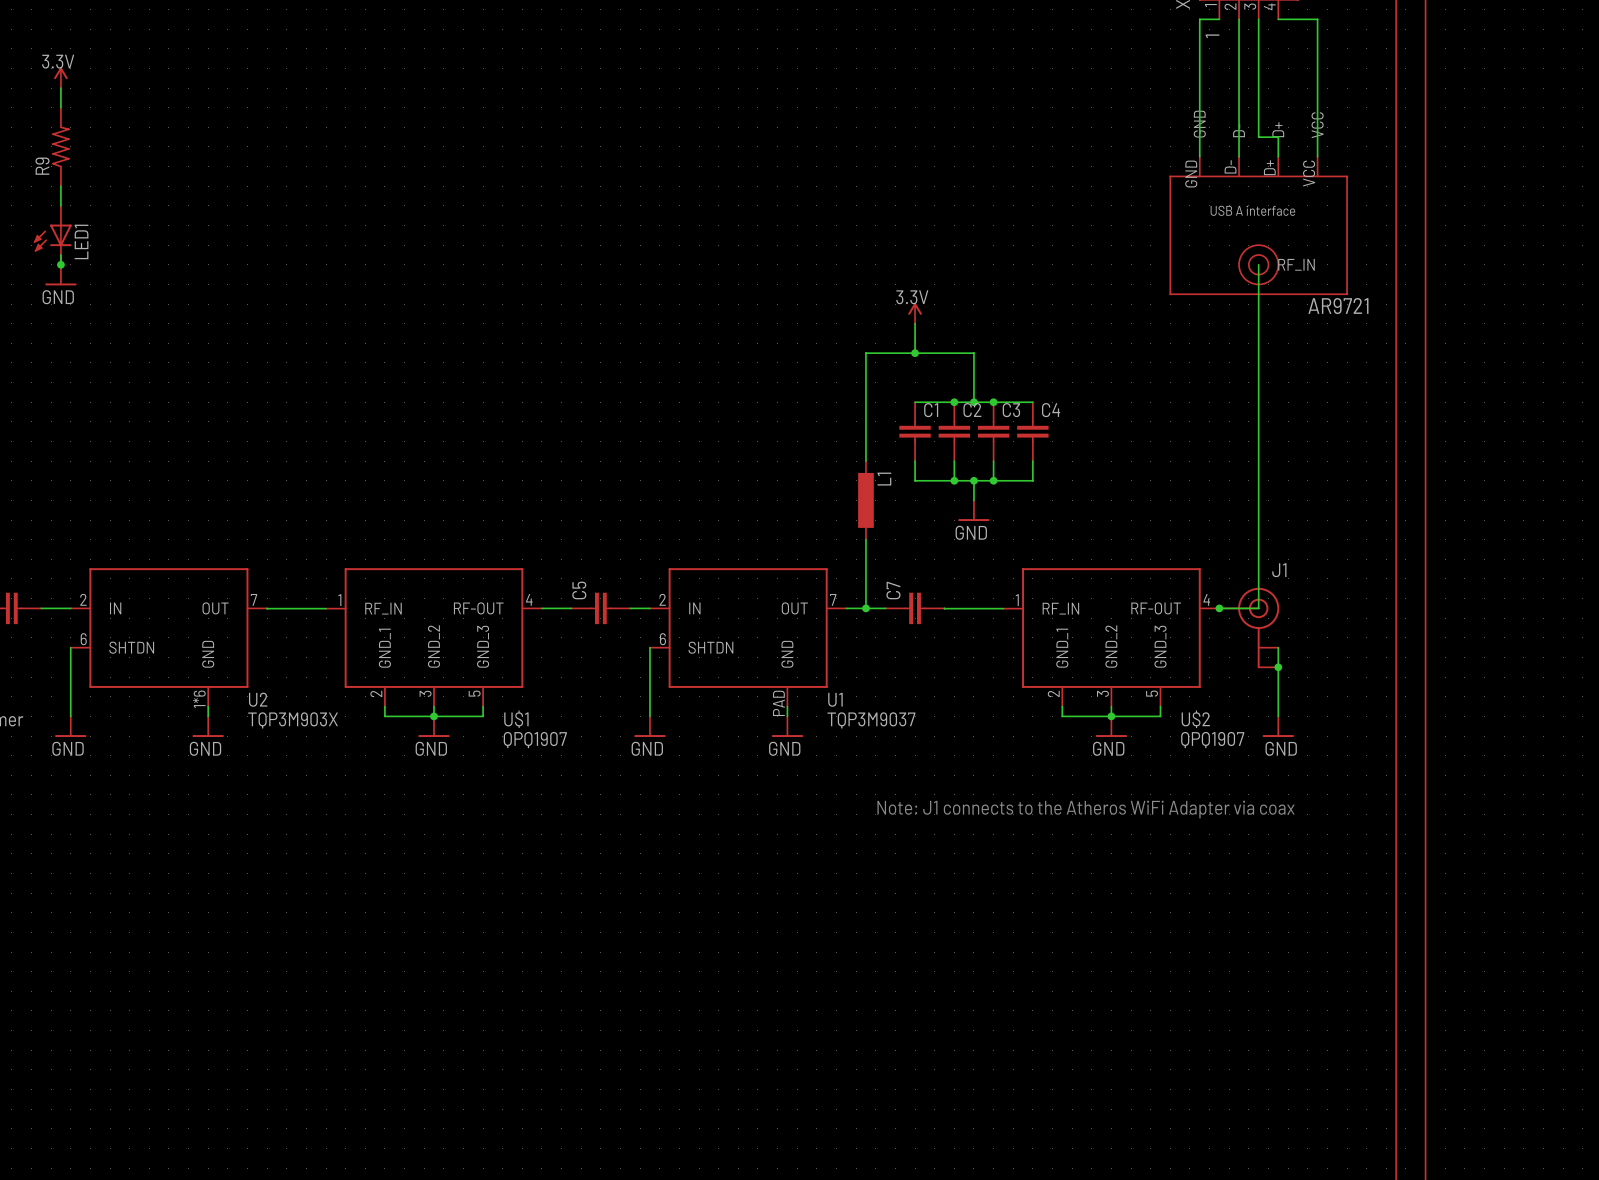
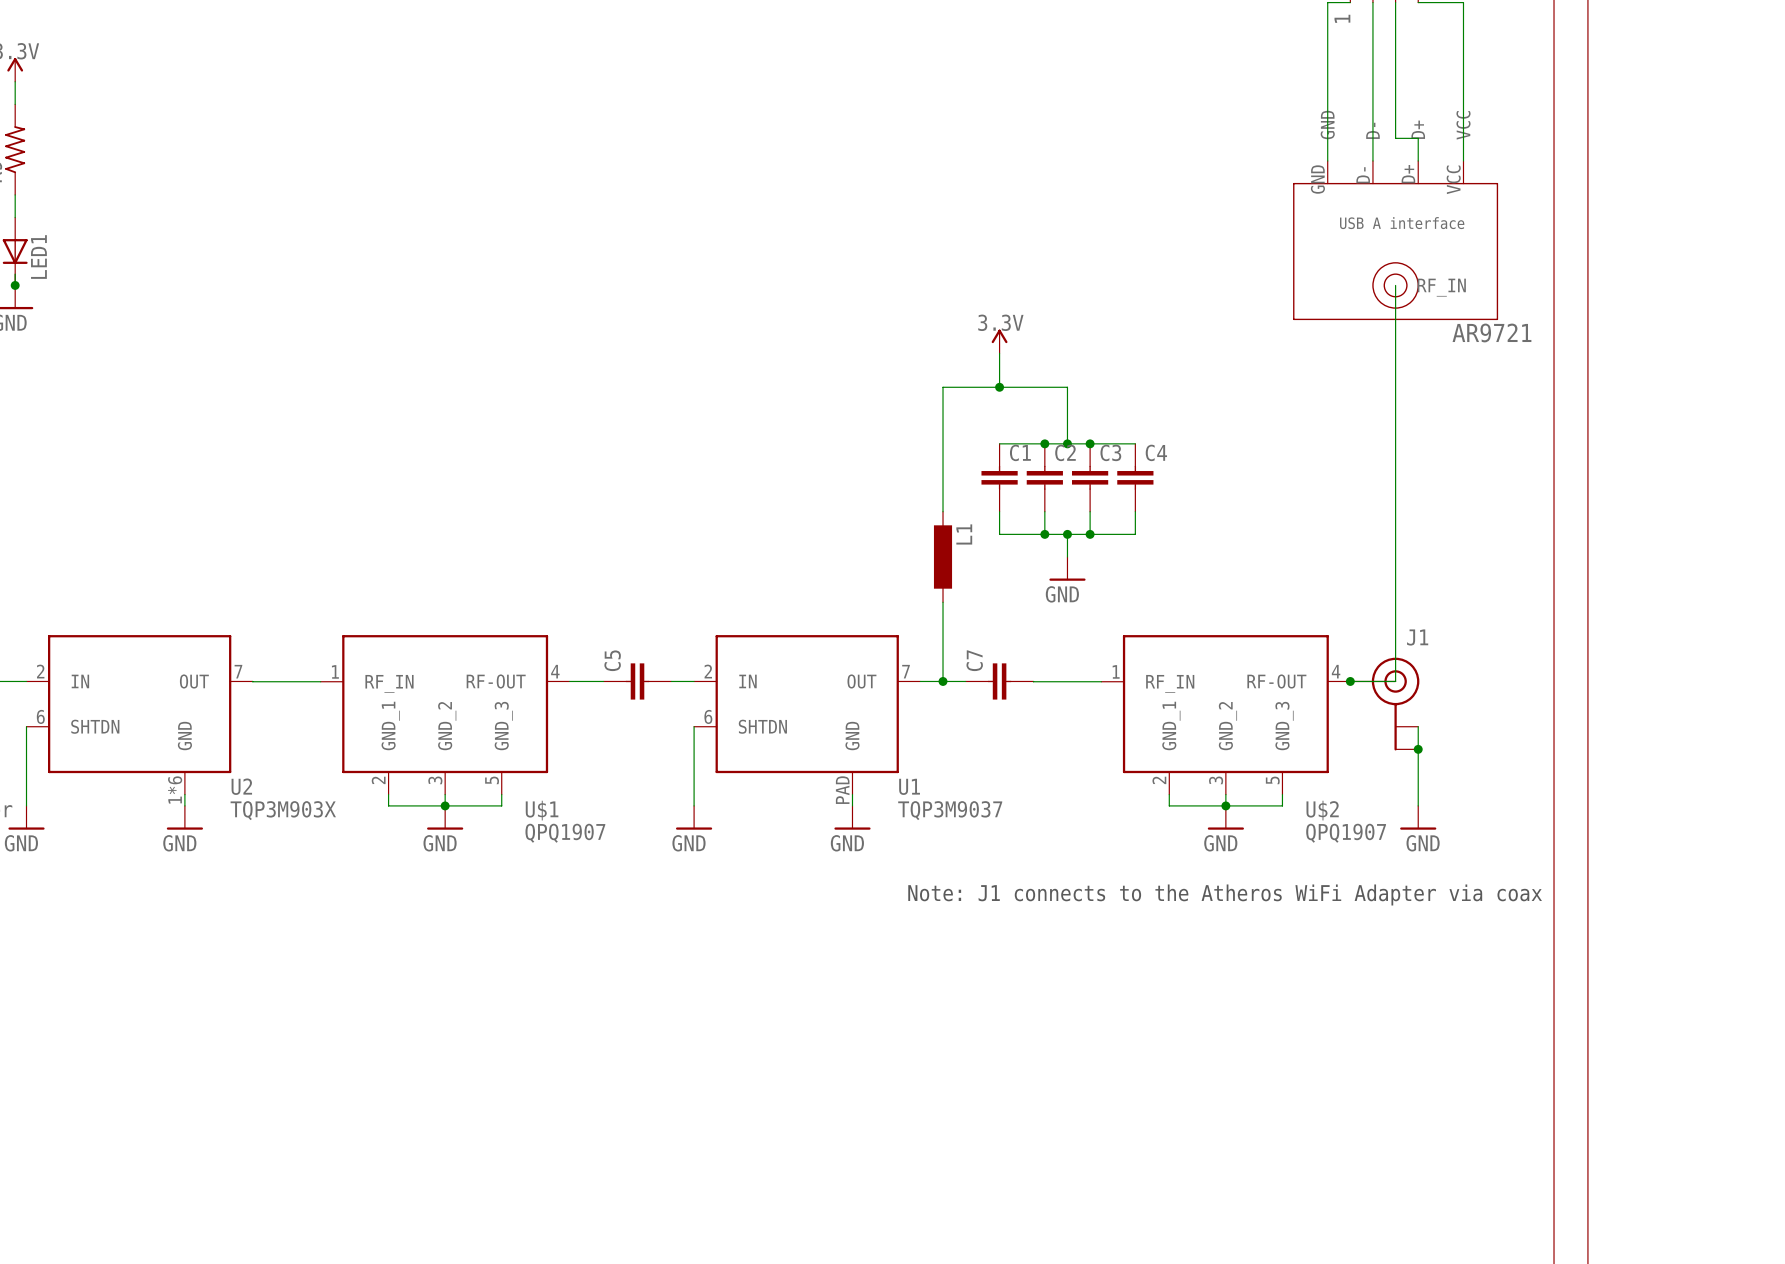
text: none -> Note: J1 connects to the Atheros WiFi Adapter via coax (1225, 894)
text: Note: J1 connects to the Atheros WiFi Adapter via coax (1086, 809) -> none

